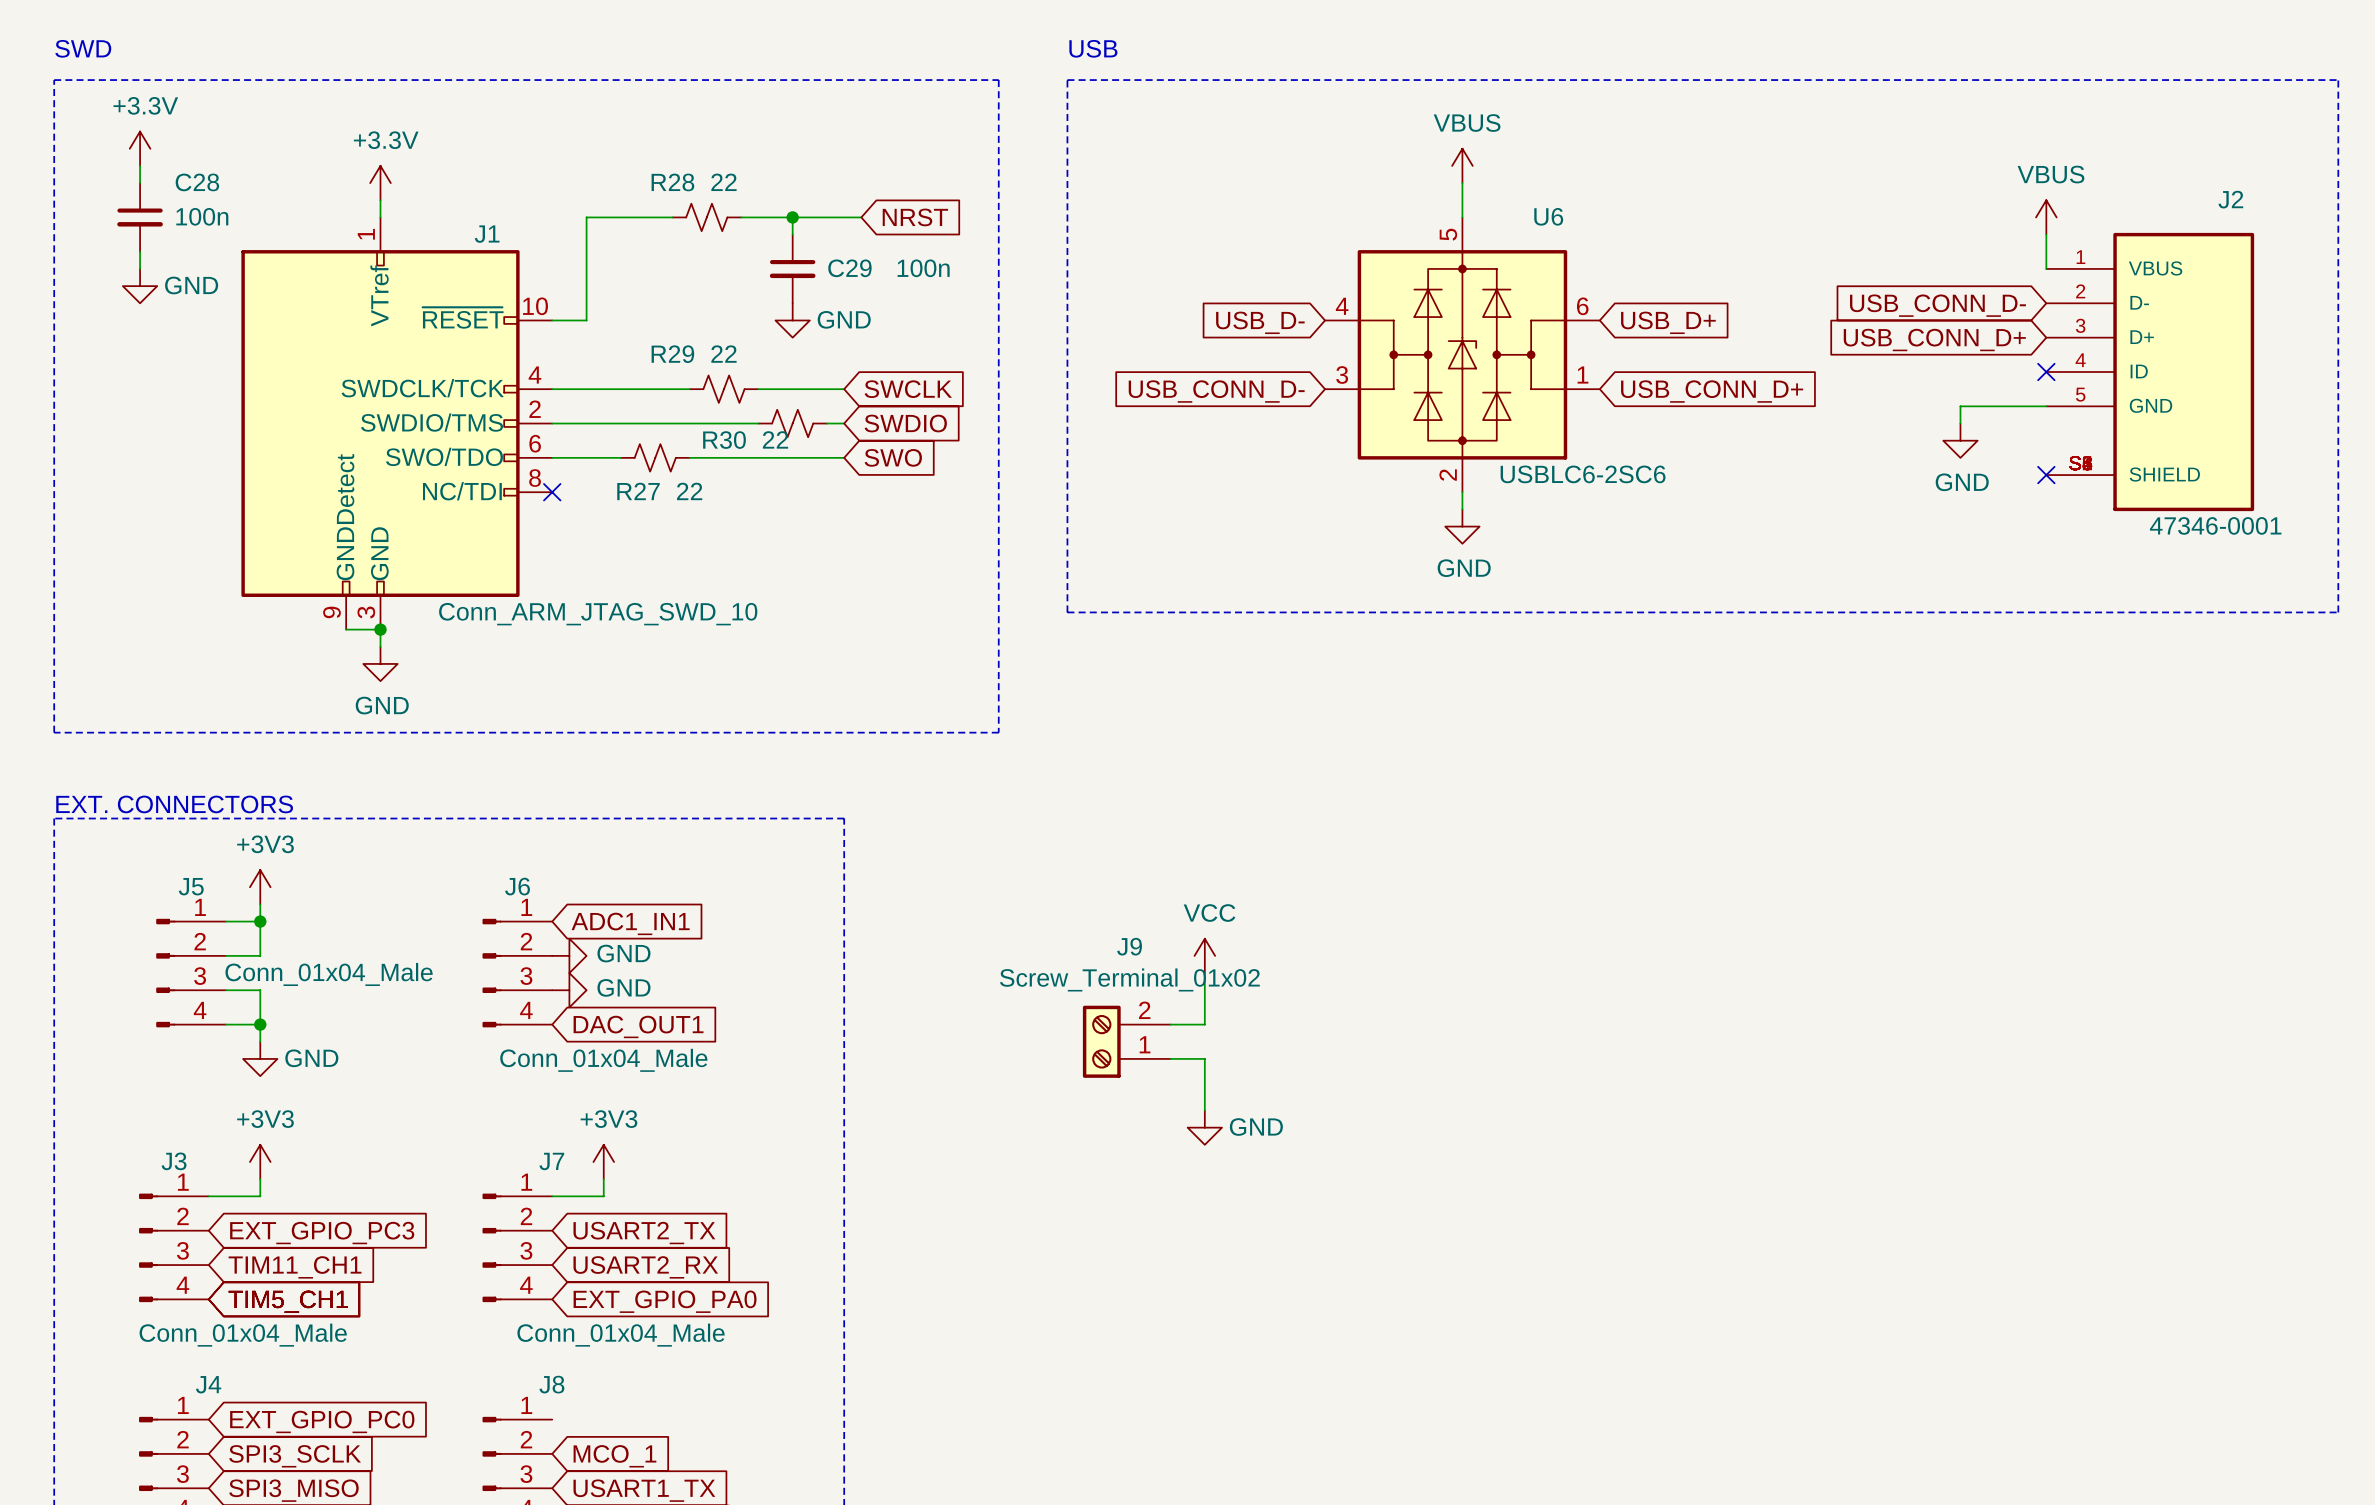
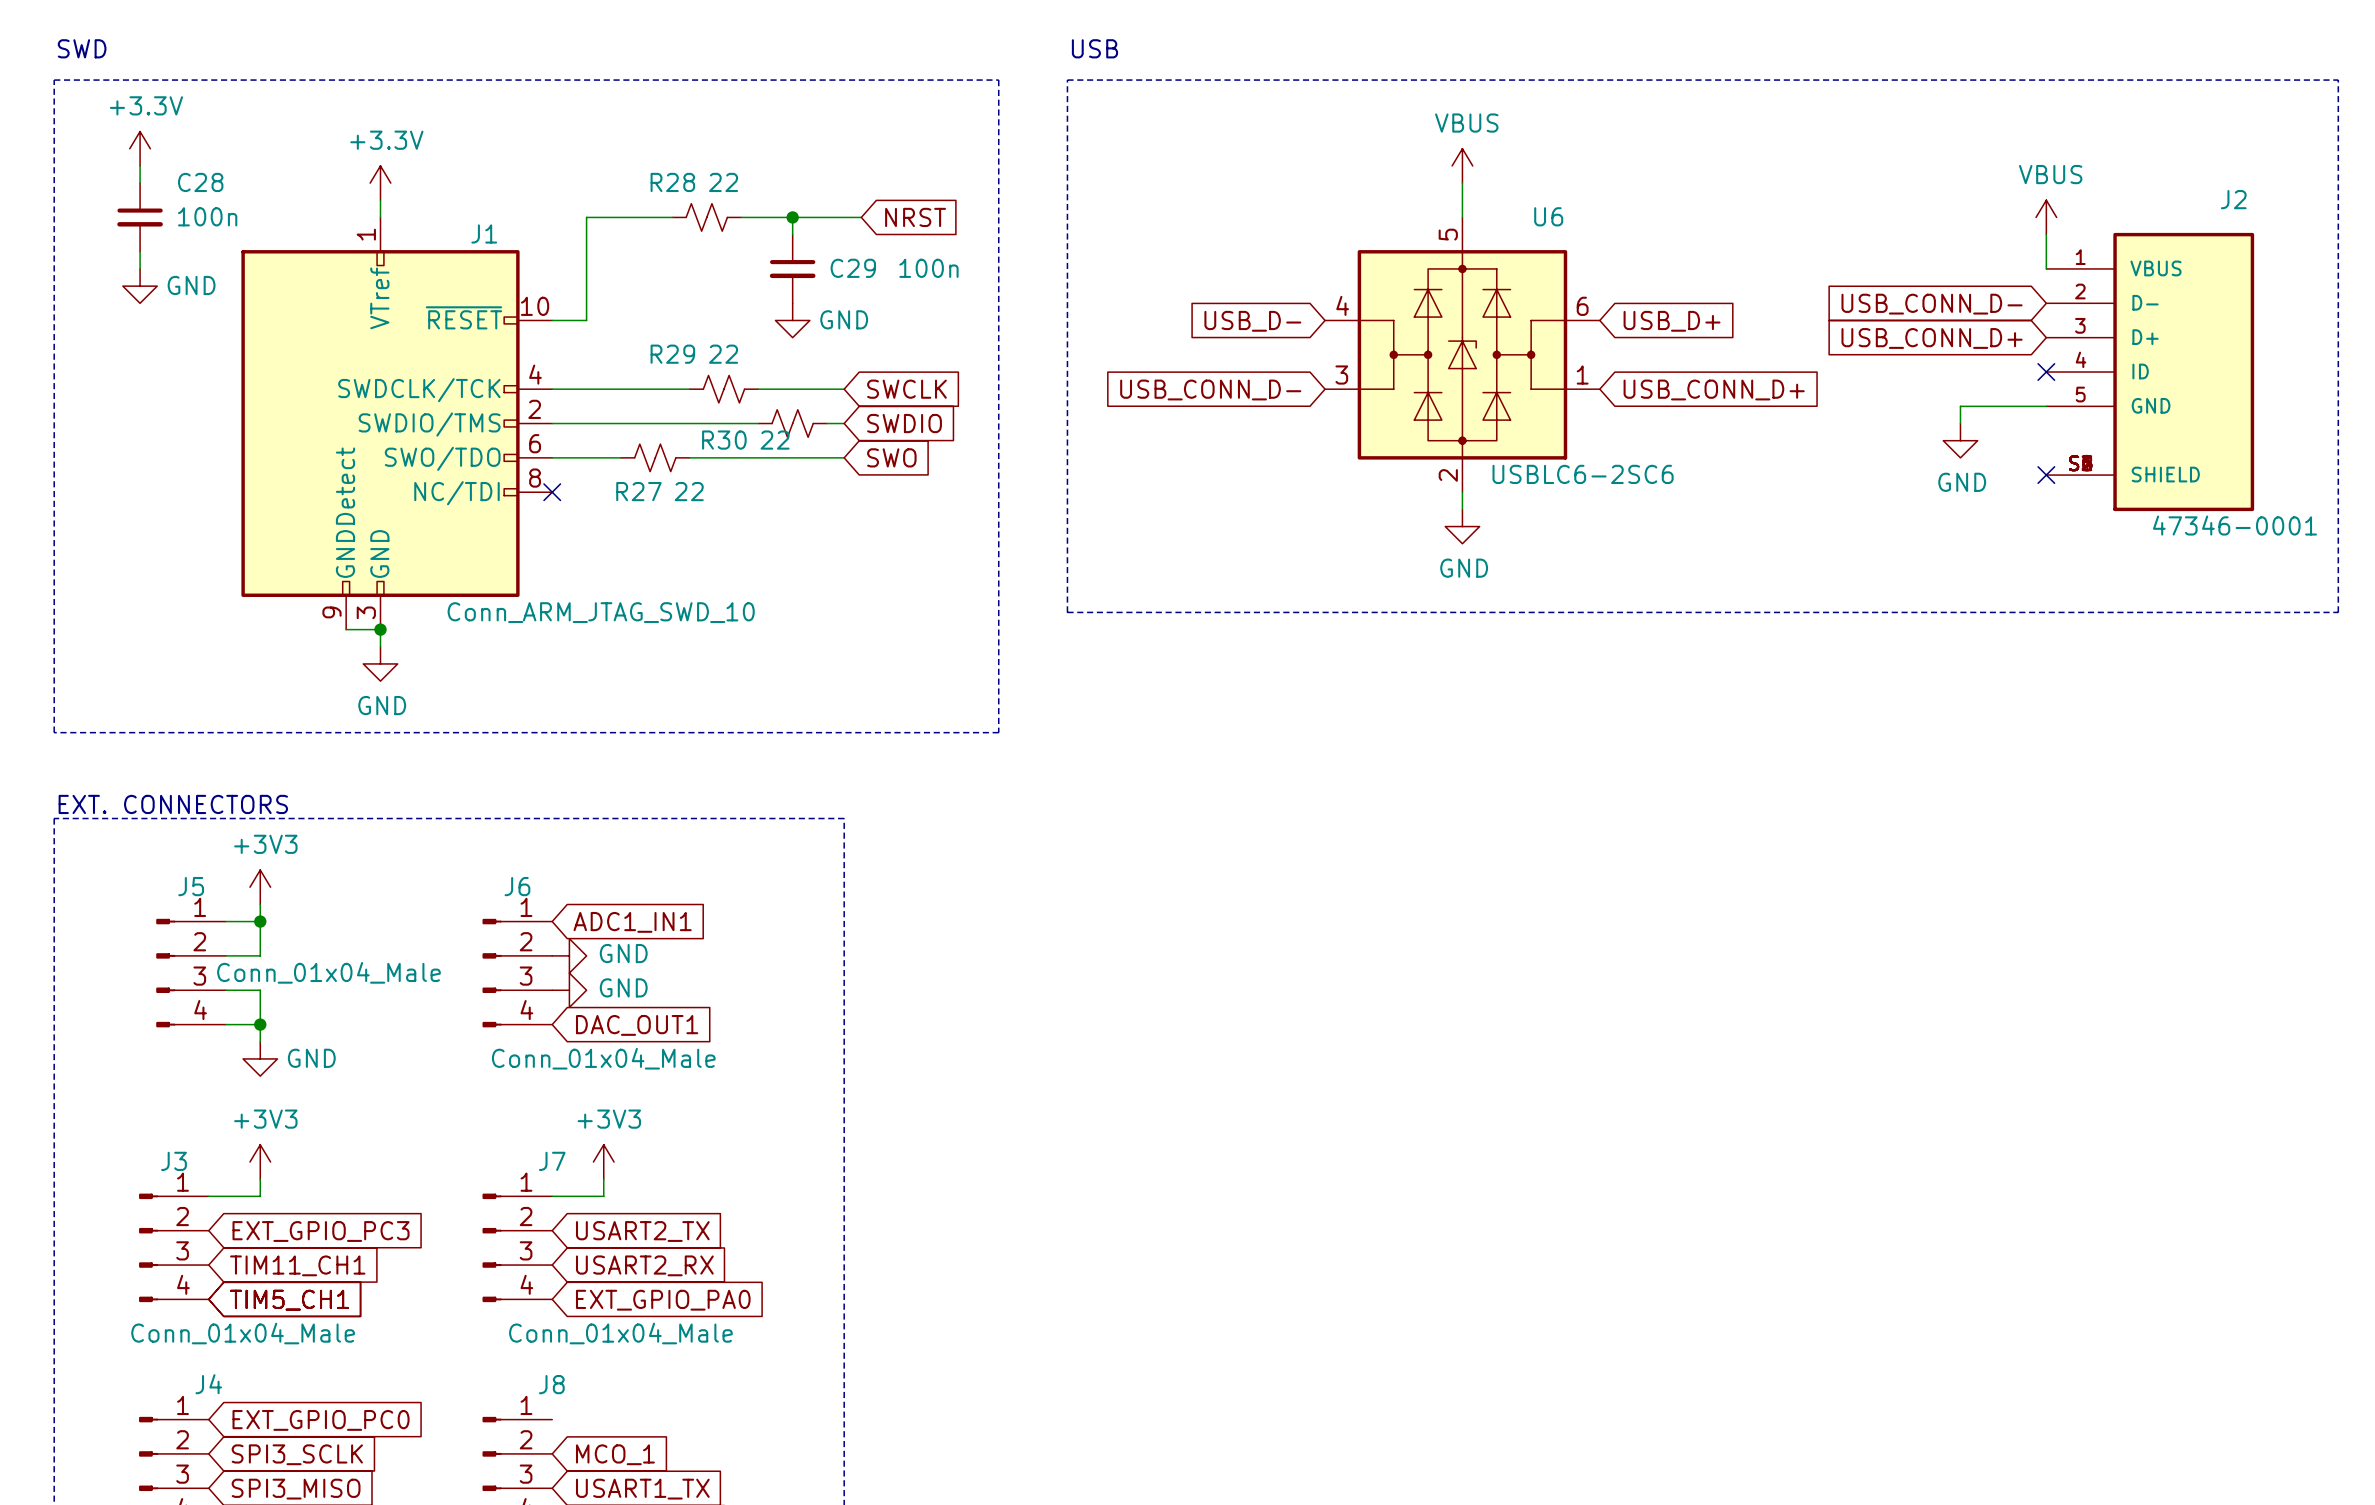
power symbol: VCC (1204, 955) -> none
wire: (1204, 973) (1204, 1024) (1170, 1024) -> none
J9: Screw_Terminal_01x02 (1126, 1041) -> none
wire: (1170, 1058) (1204, 1058) (1204, 1110) -> none
power symbol: GND (1204, 1127) -> none

